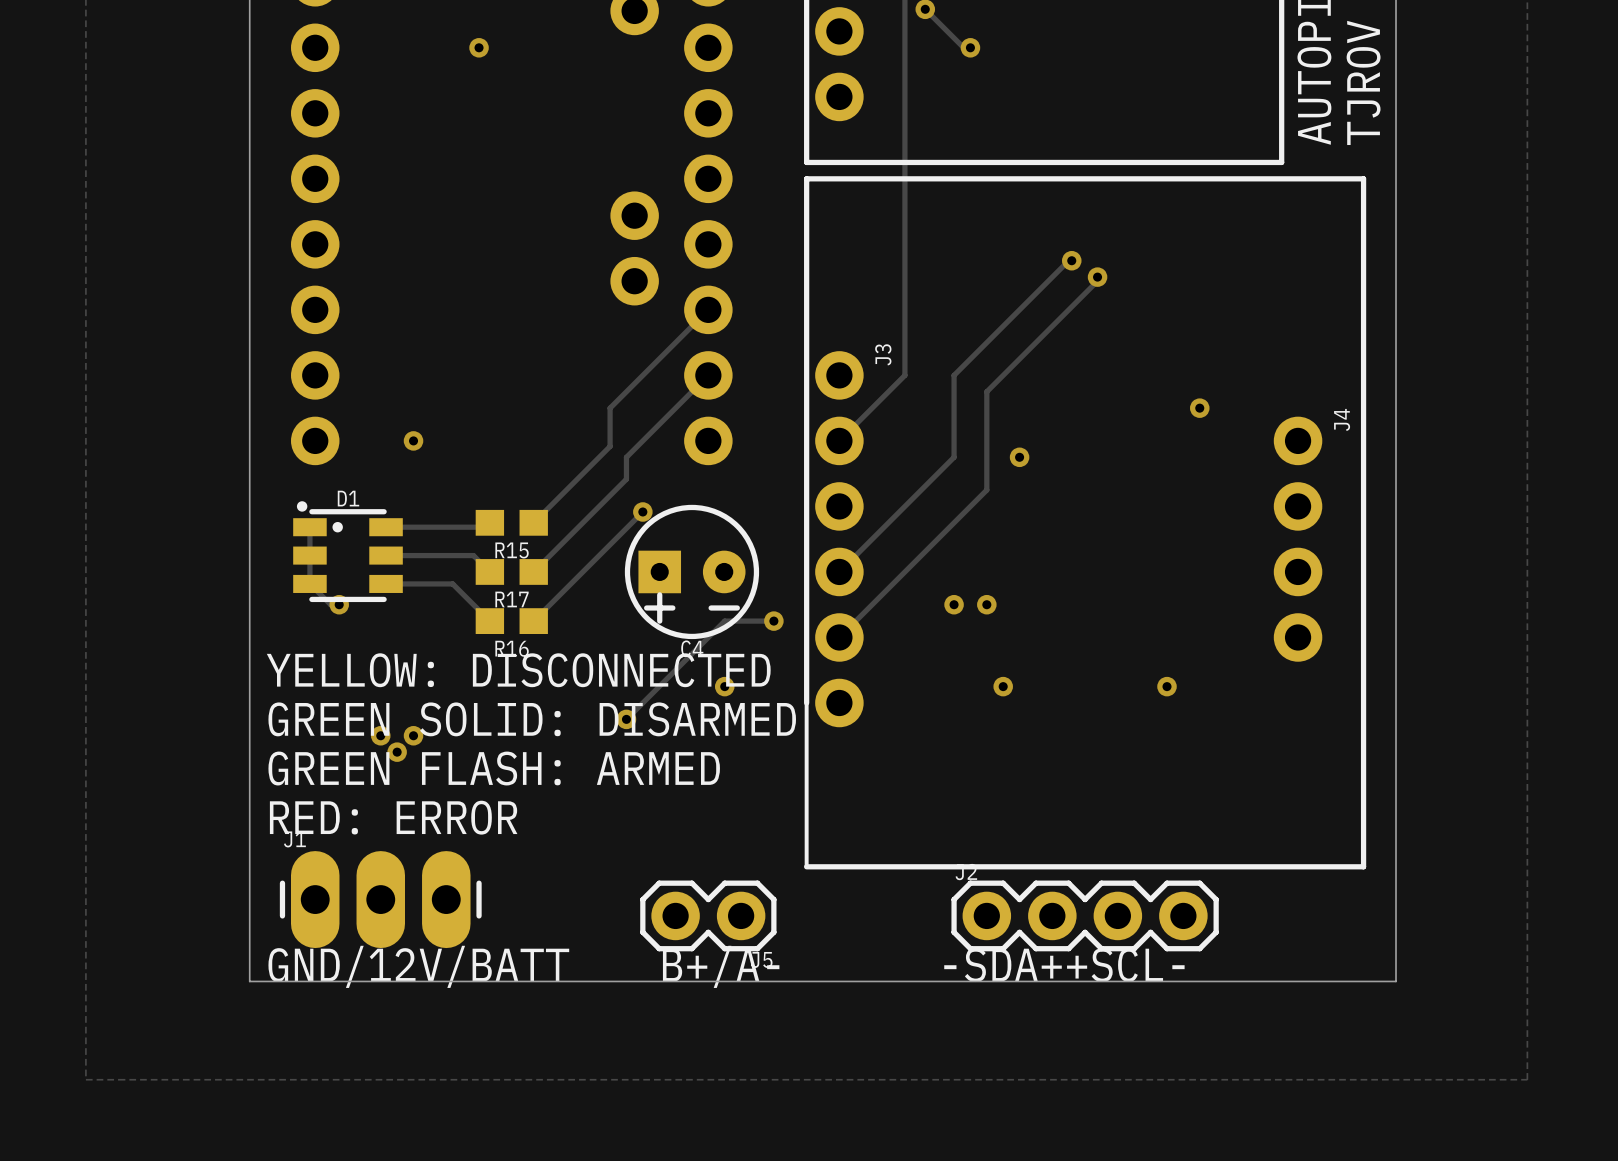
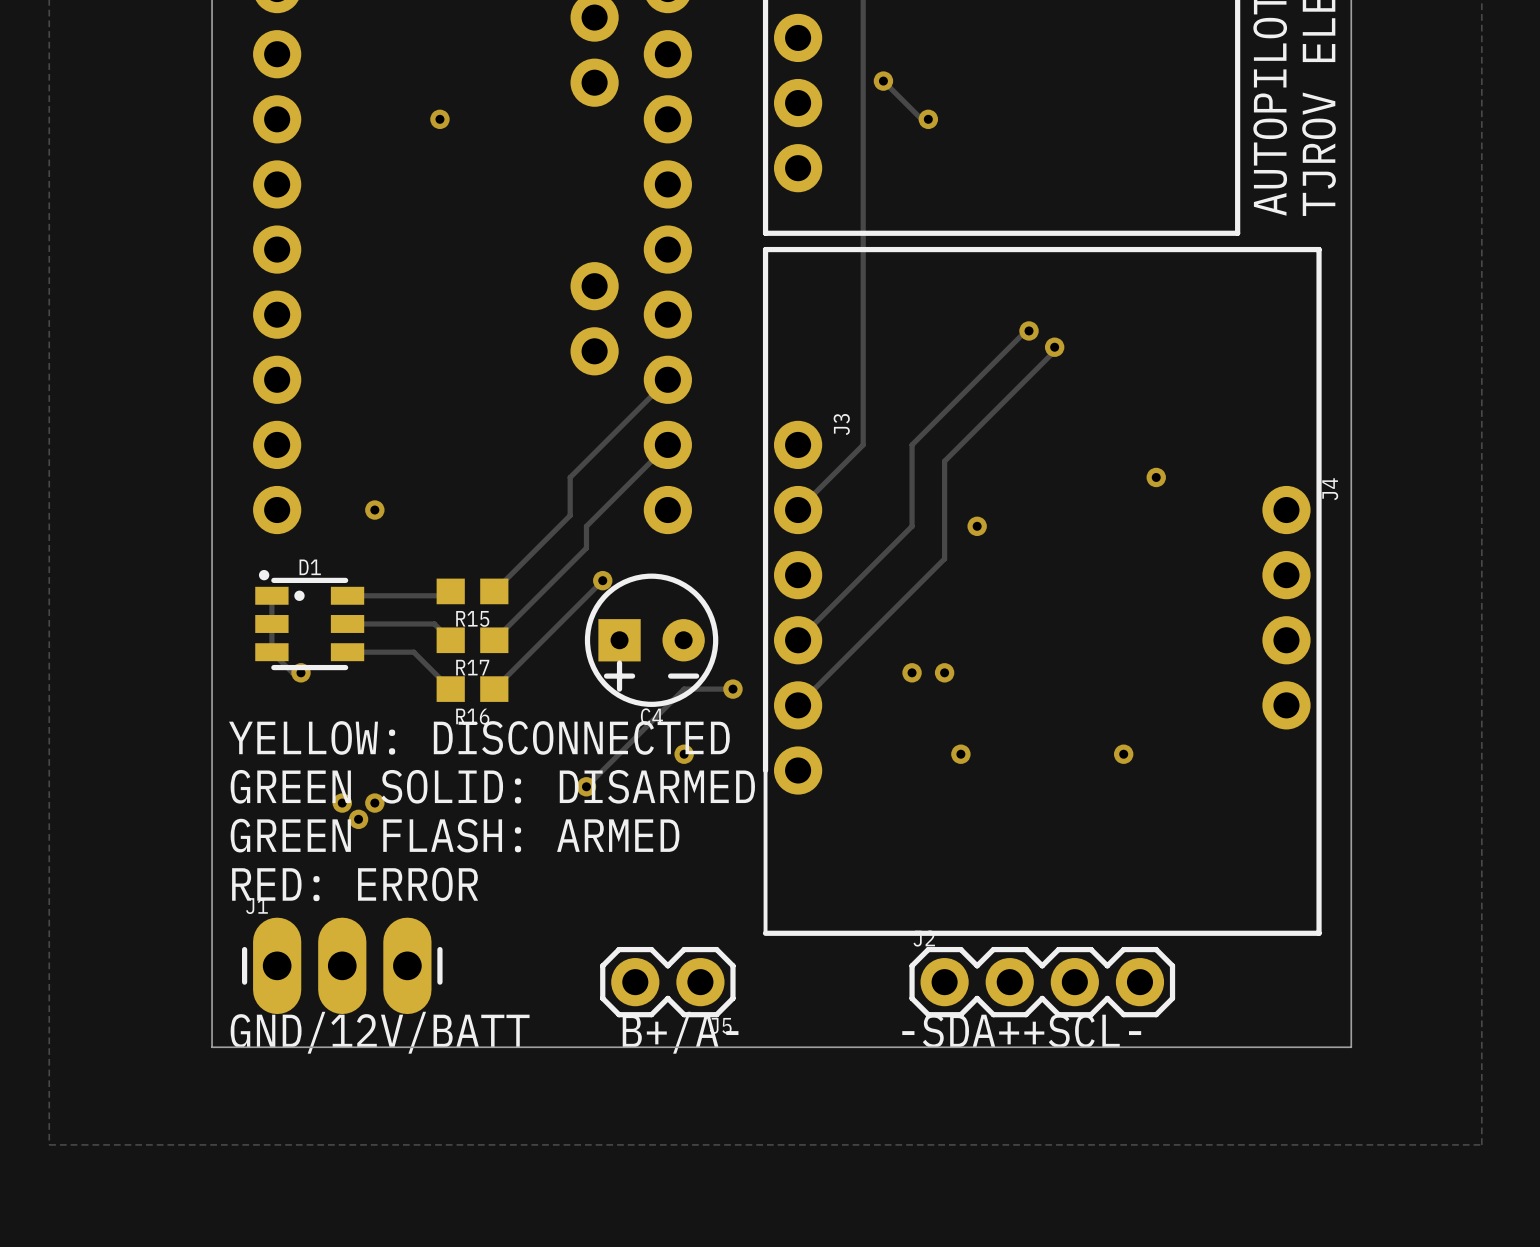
J4 position: (1298, 539) -> (1286, 607)

